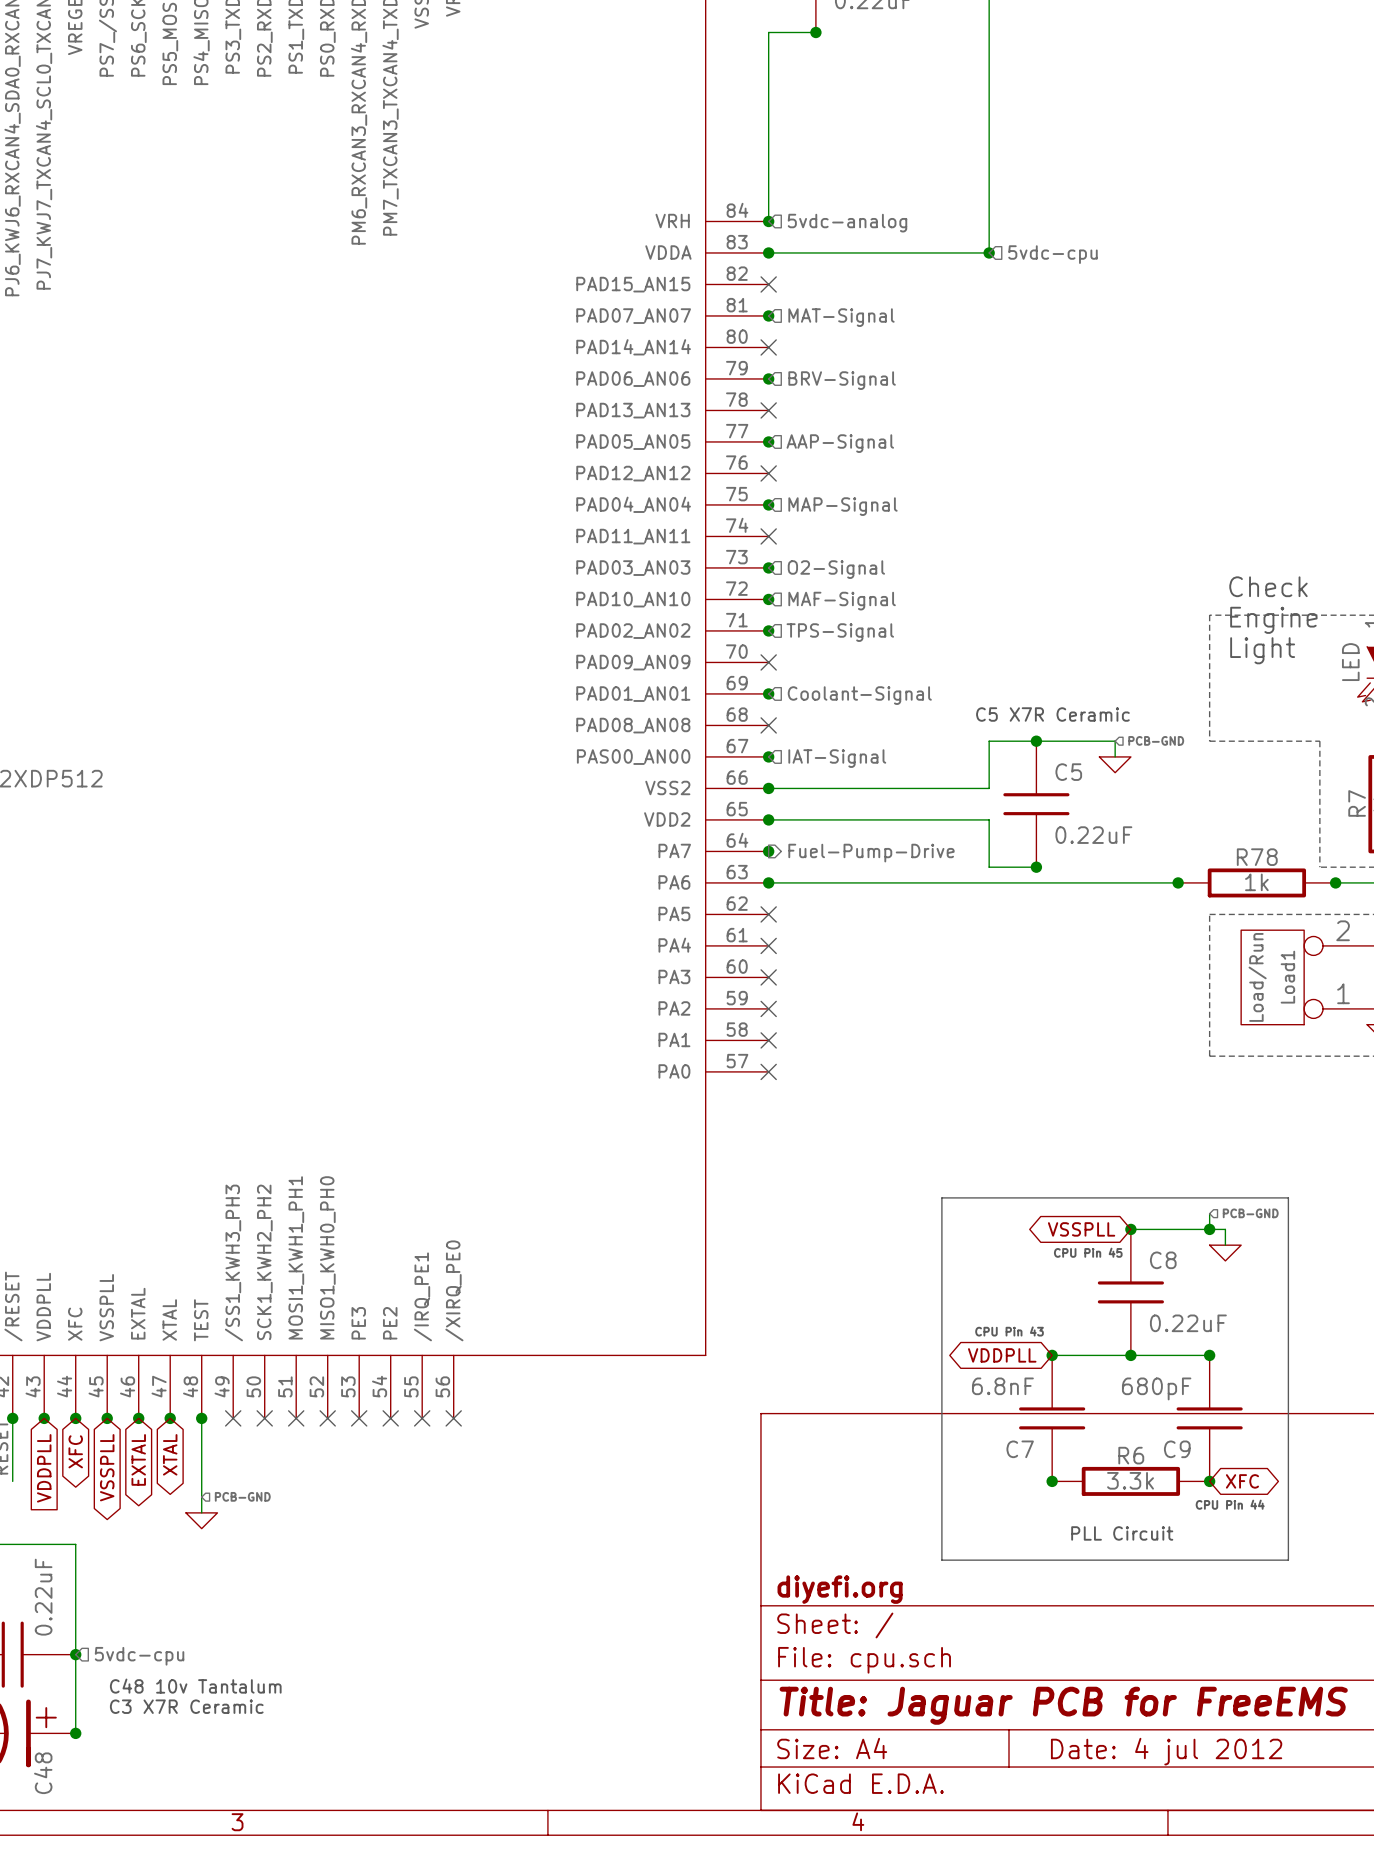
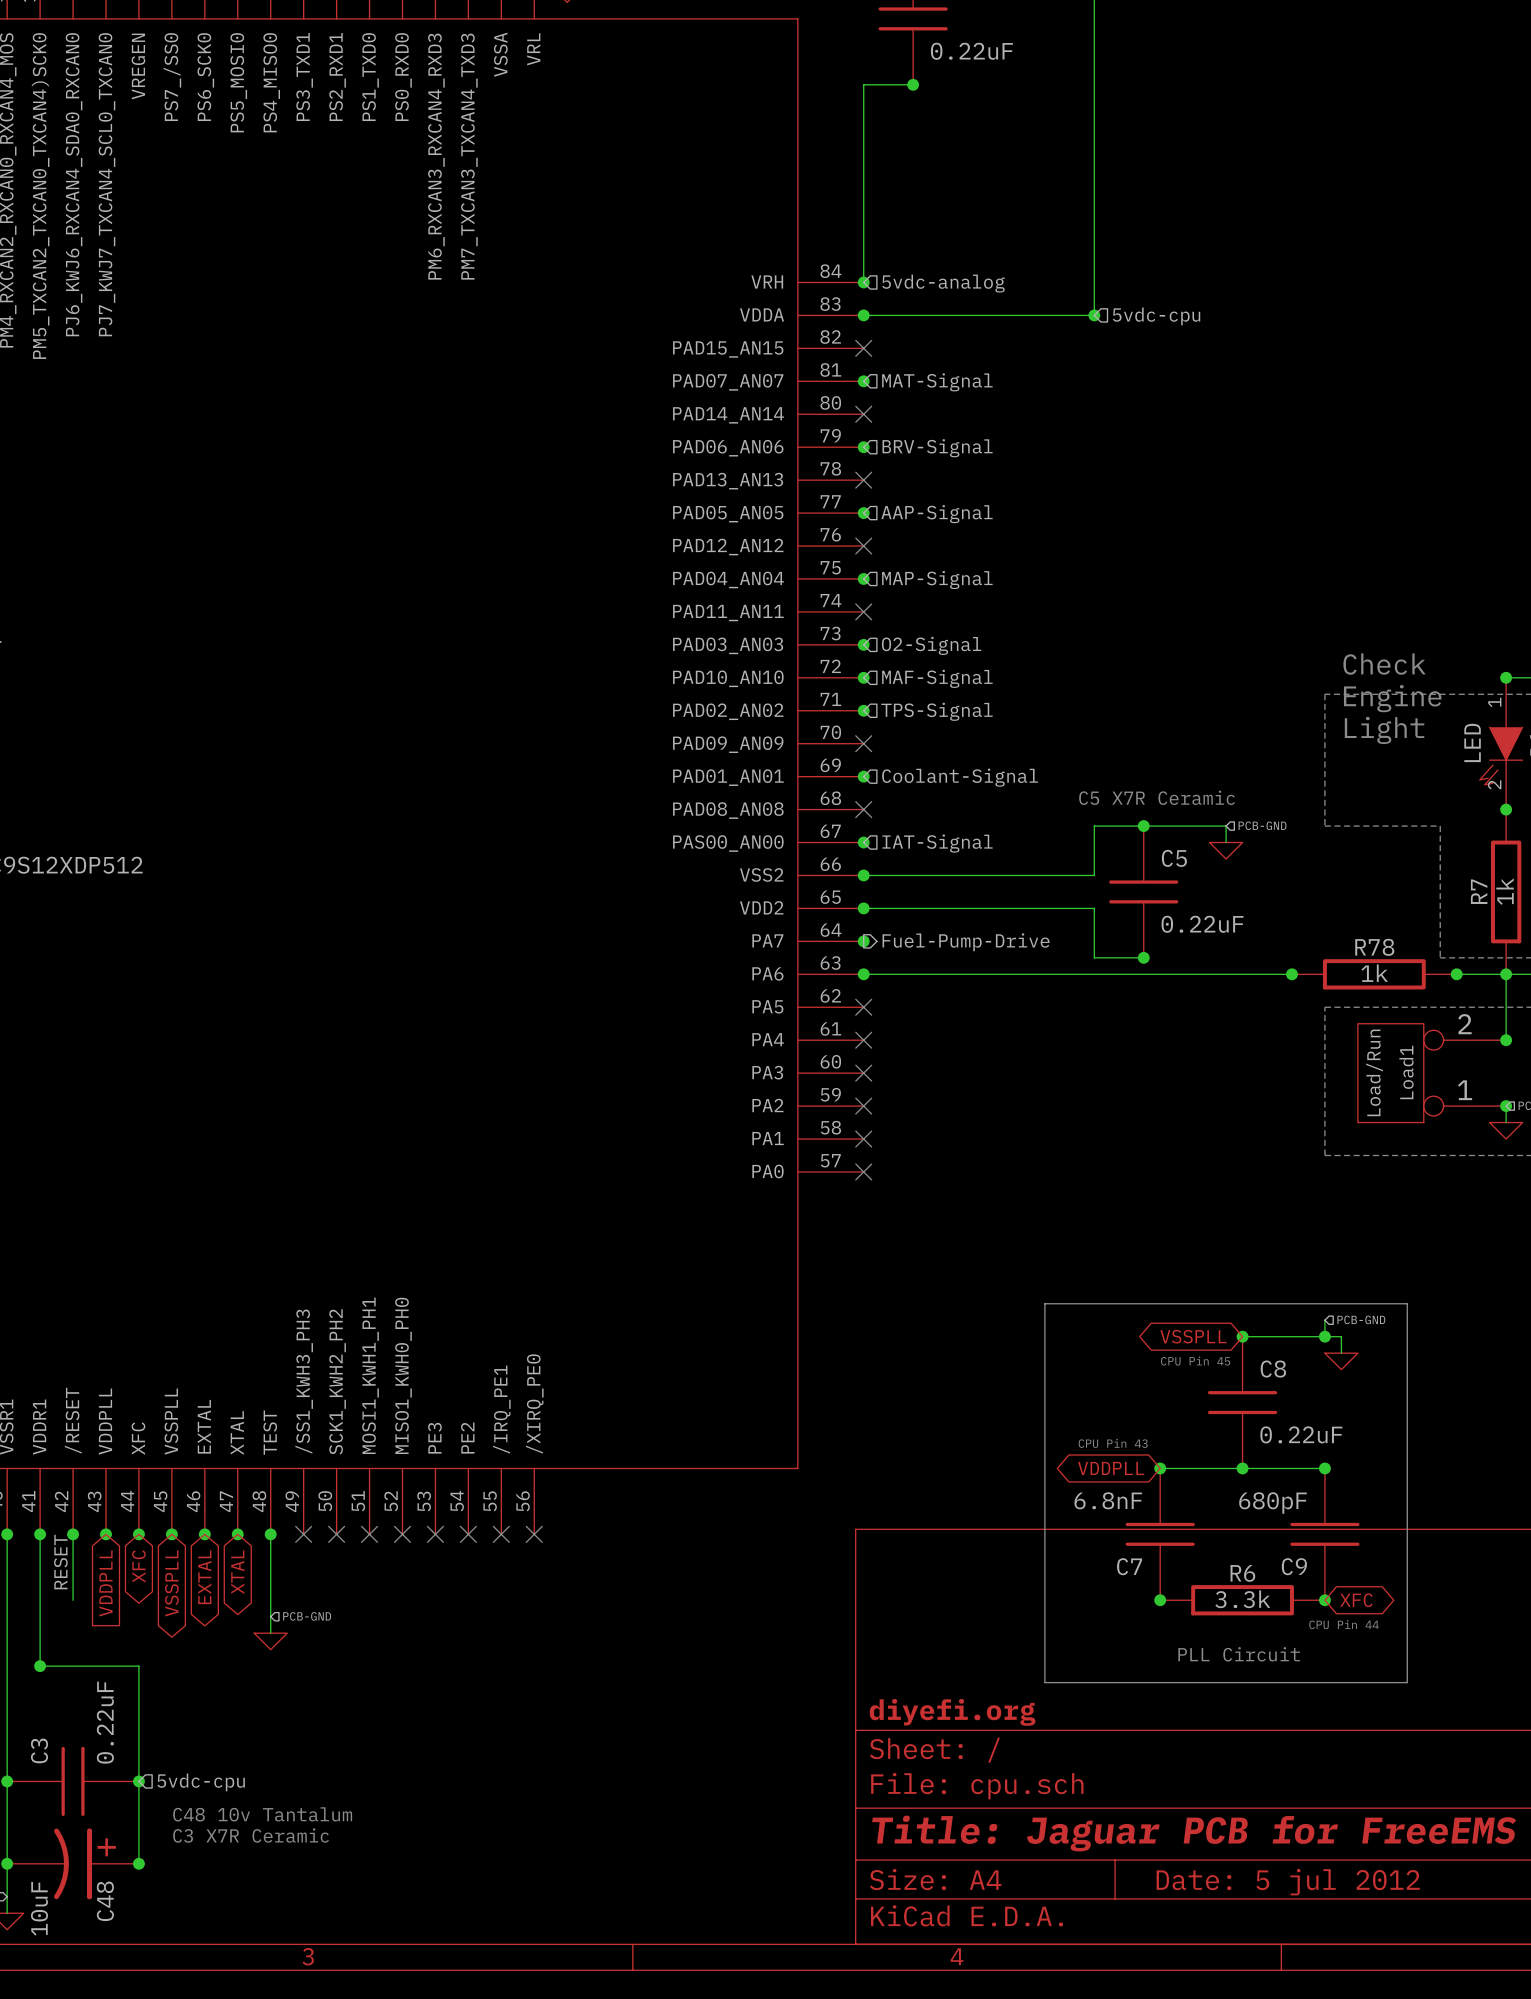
title block: Date: 4 jul 2012 (1166, 1751) -> Date: 5 jul 2012 (1288, 1882)

